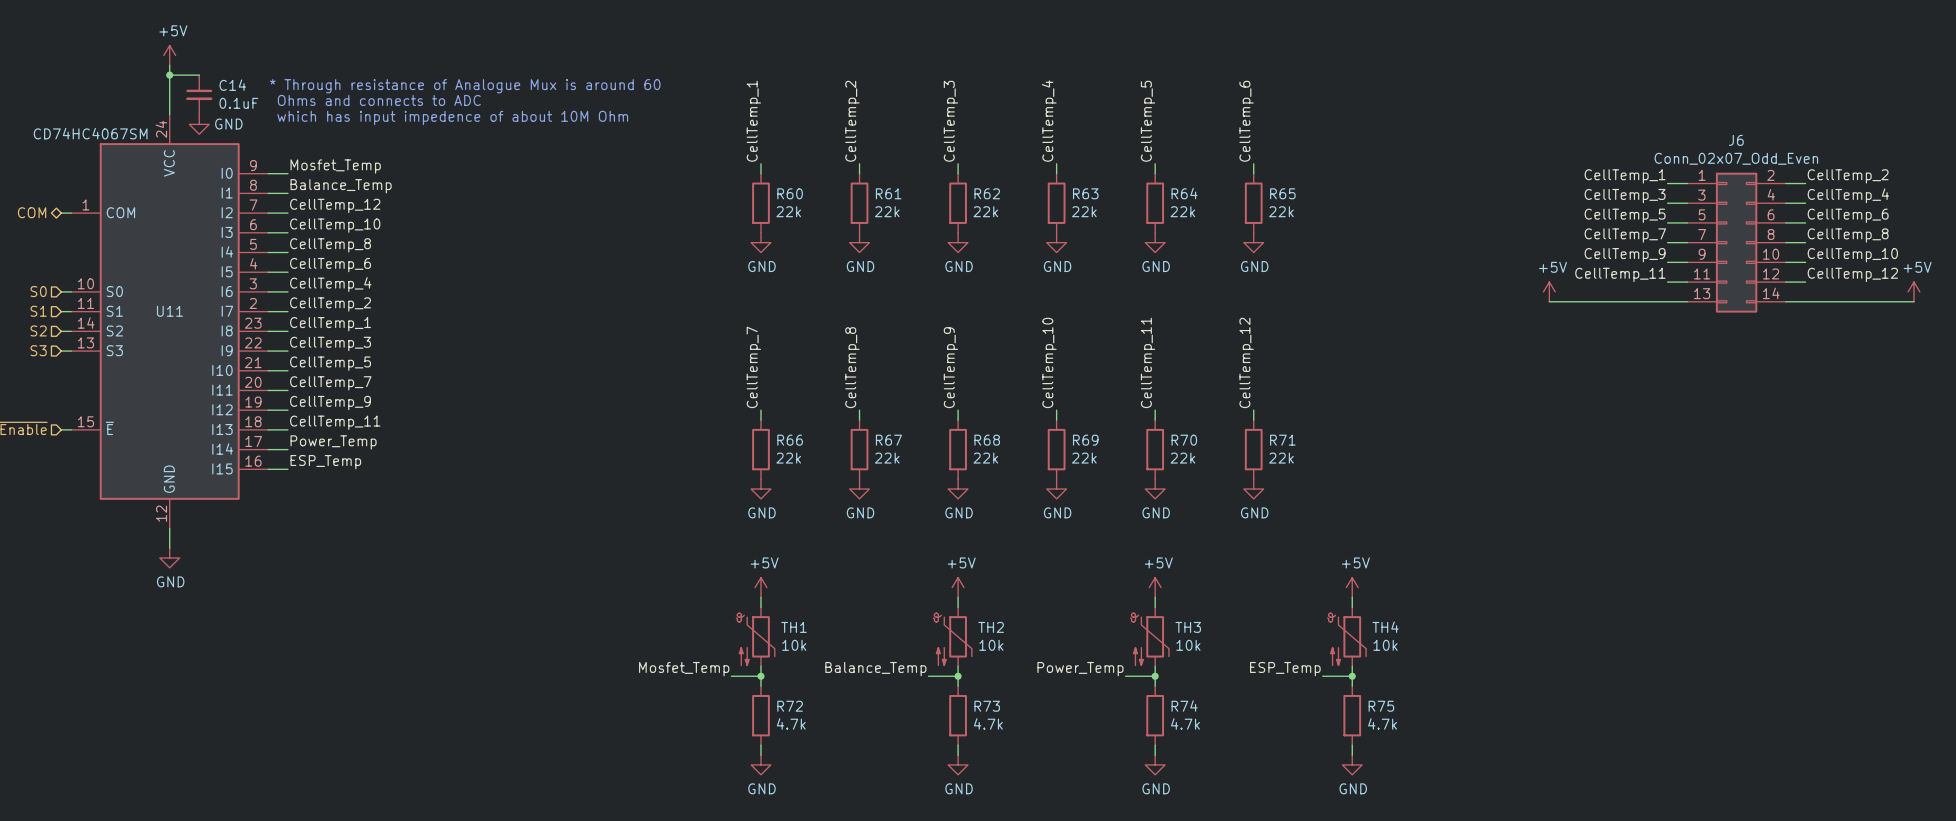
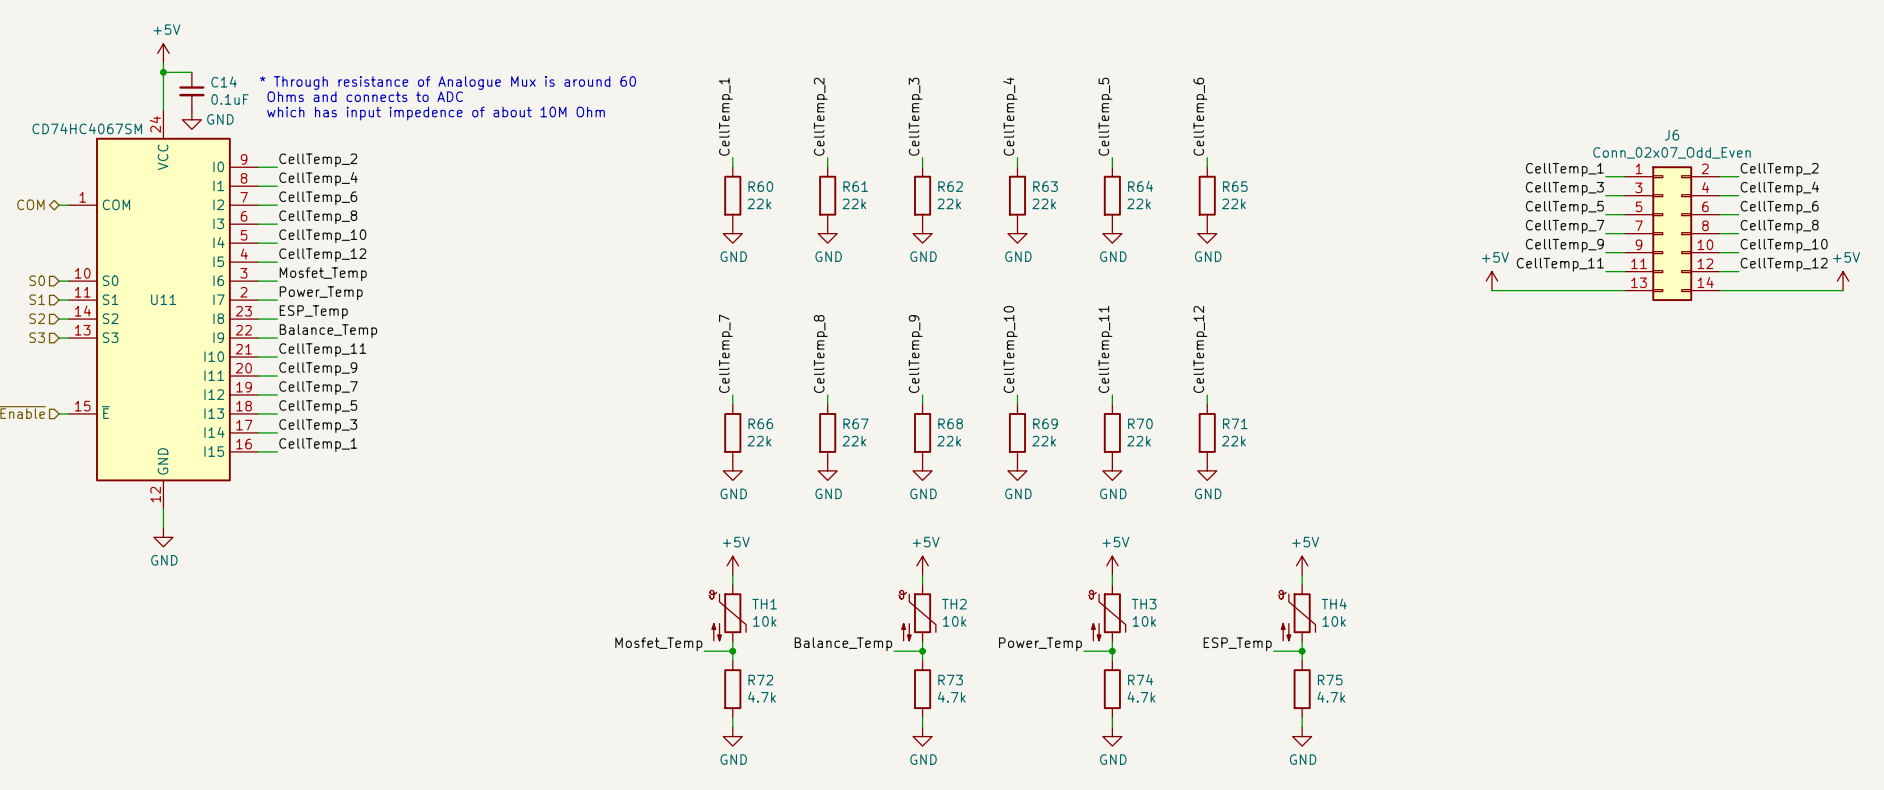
label: Mosfet_Temp (335, 166) -> CellTemp_2 (318, 160)
label: Balance_Temp (341, 186) -> CellTemp_4 (318, 179)
label: CellTemp_12 (335, 205) -> CellTemp_6 (318, 198)
label: CellTemp_10 (335, 225) -> CellTemp_8 (318, 217)
label: CellTemp_8 (330, 245) -> CellTemp_10 (322, 236)
label: CellTemp_6 (330, 265) -> CellTemp_12 (322, 255)
label: CellTemp_4 (330, 284) -> Mosfet_Temp (323, 274)
label: CellTemp_2 (330, 304) -> Power_Temp (321, 293)
label: CellTemp_1 (330, 324) -> ESP_Temp (313, 312)
label: CellTemp_3 (330, 343) -> Balance_Temp (328, 331)
label: CellTemp_5 (330, 363) -> CellTemp_11 (322, 350)
label: CellTemp_7 (330, 383) -> CellTemp_9 (318, 369)
label: CellTemp_9 (330, 403) -> CellTemp_7 (318, 388)
label: CellTemp_11 (335, 422) -> CellTemp_5 (318, 407)
label: Power_Temp (333, 442) -> CellTemp_3 (318, 426)
label: ESP_Temp (325, 462) -> CellTemp_1 (318, 445)

